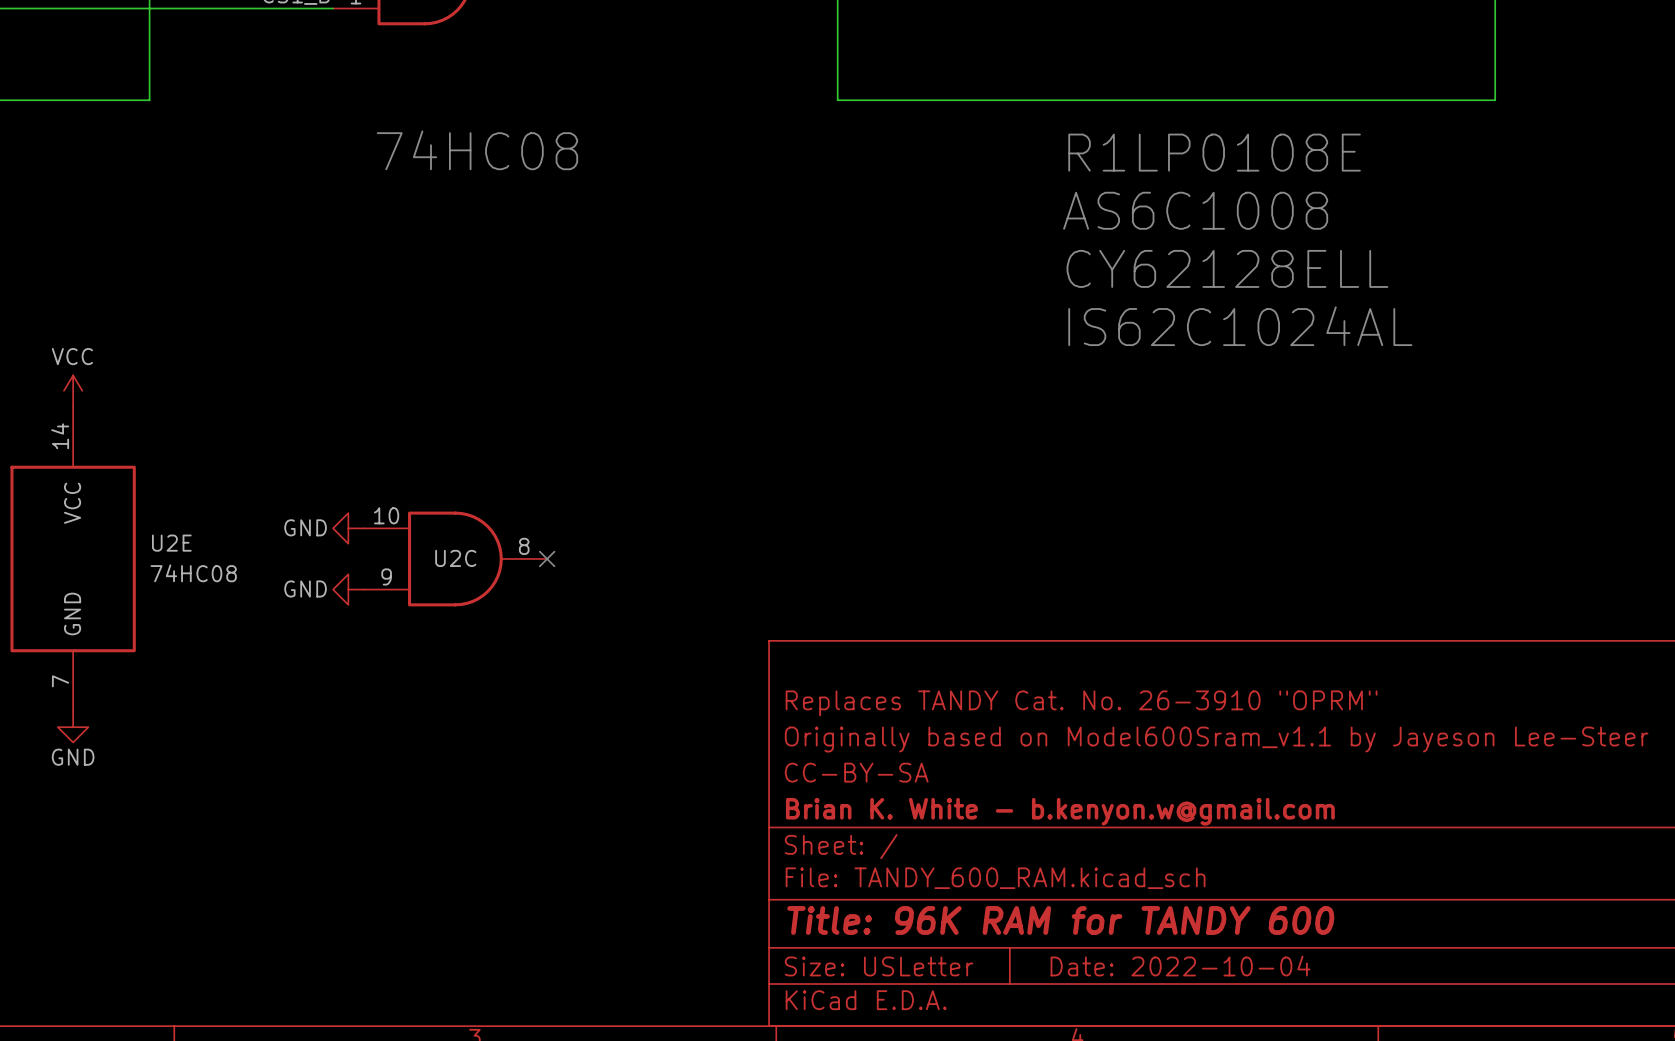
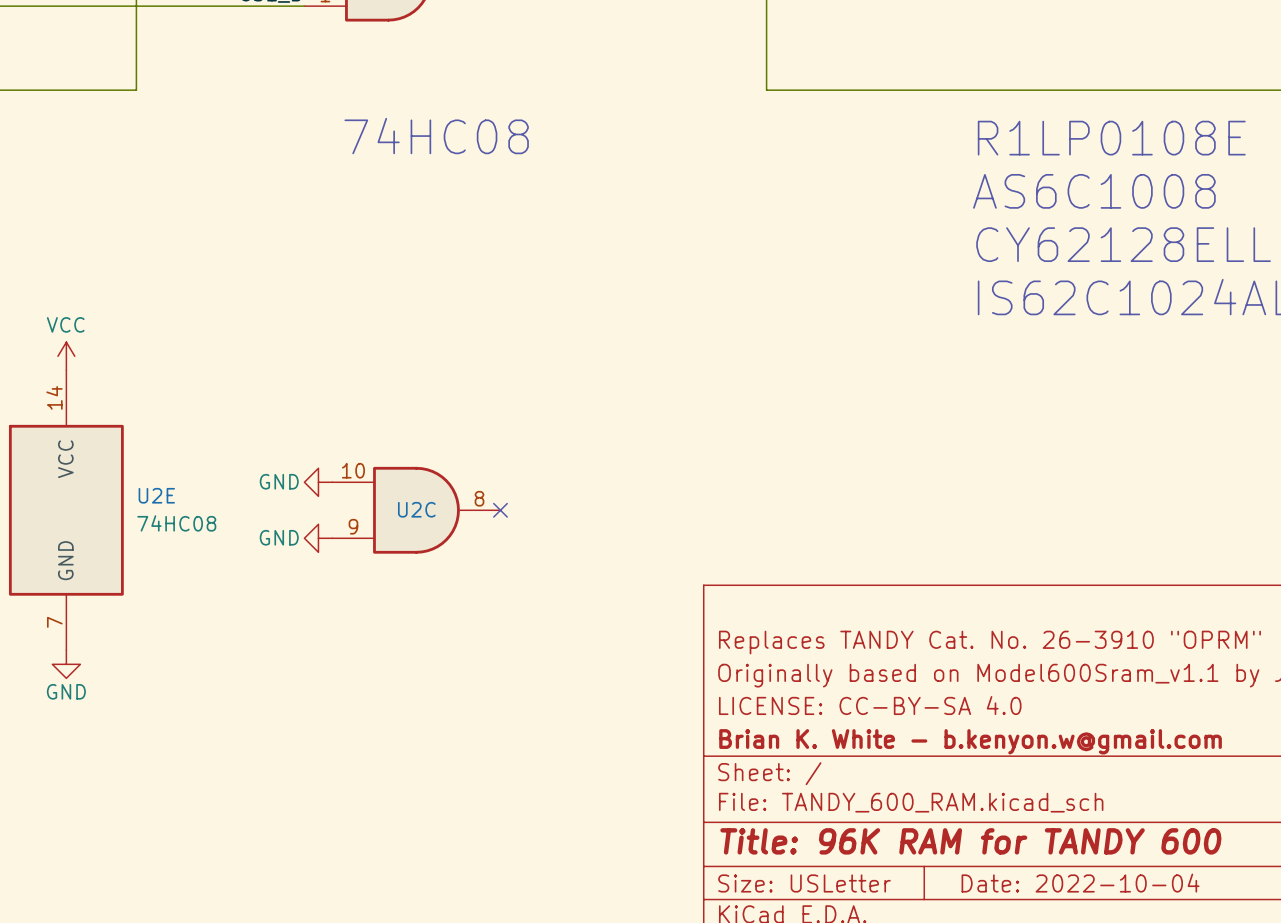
title block: CC-BY-SA (856, 772) -> LICENSE: CC-BY-SA 4.0 (870, 705)

